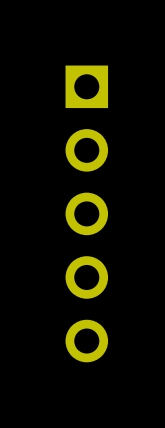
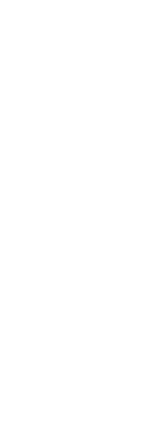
part: (86, 213) -> none

